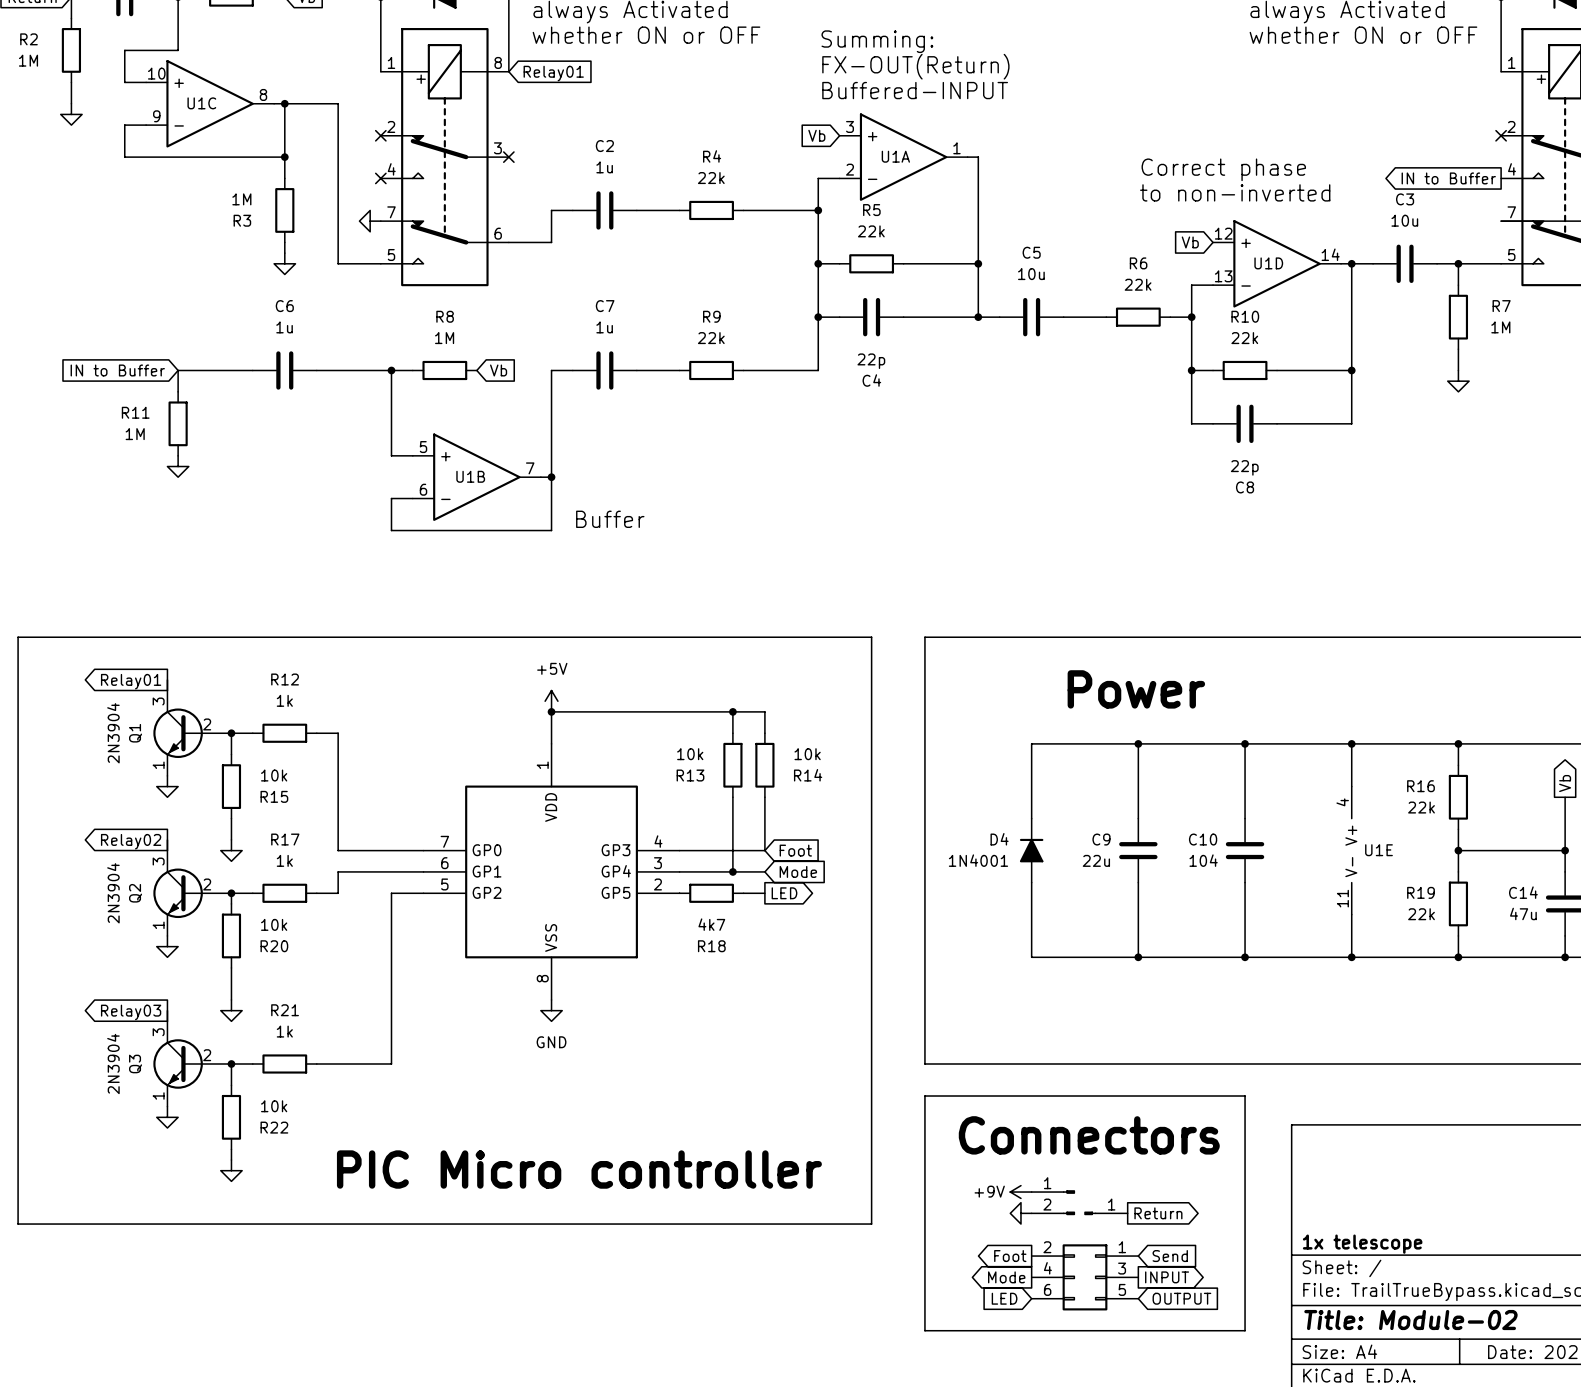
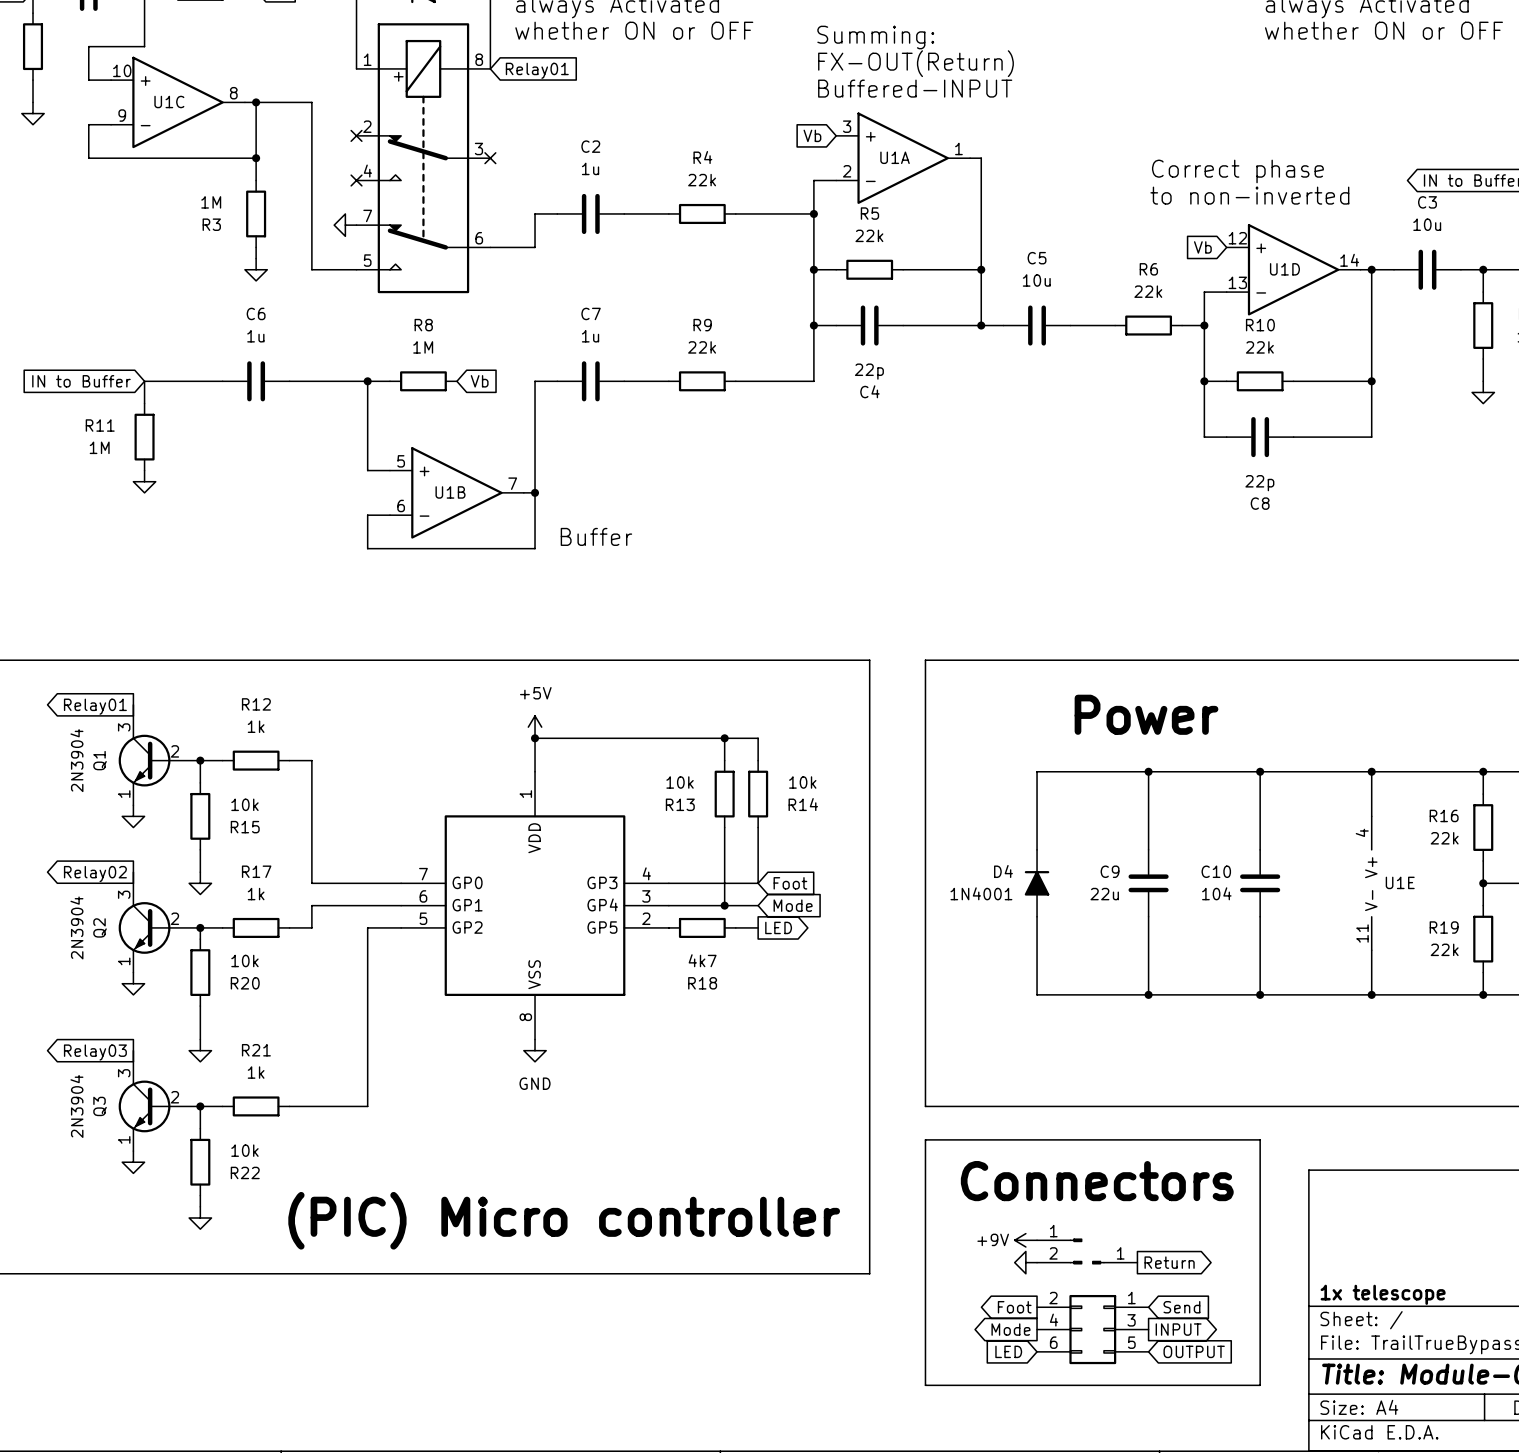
text: PIC Micro controller (579, 1169) -> (PIC) Micro controller (564, 1220)

